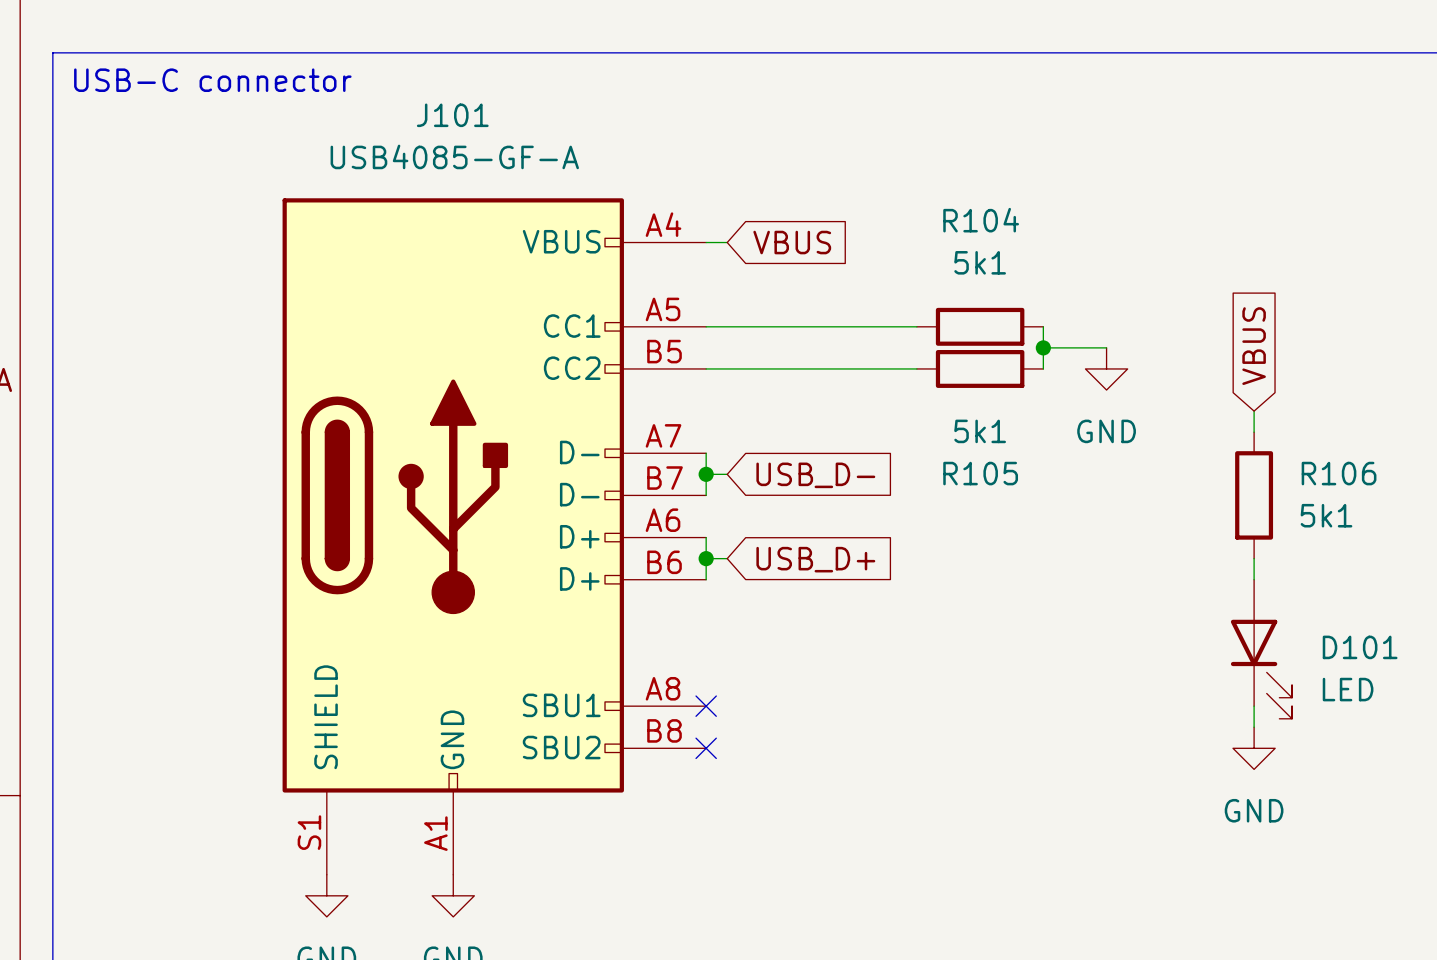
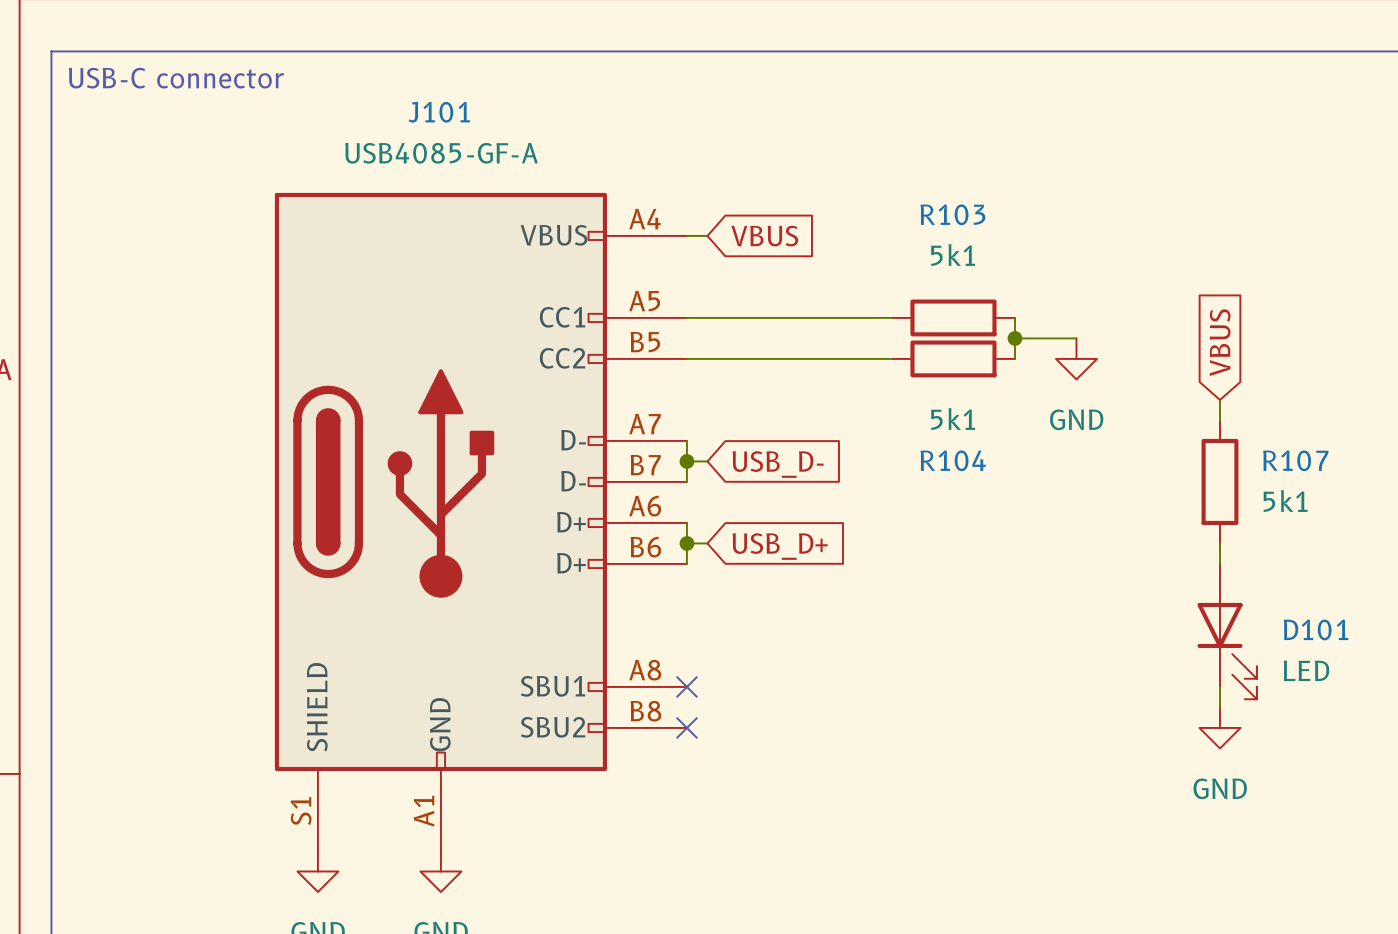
R104 name: R104 (981, 220) -> R103 (952, 214)
R105 name: R105 (980, 473) -> R104 (953, 460)
R106 name: R106 (1339, 473) -> R107 (1295, 460)

